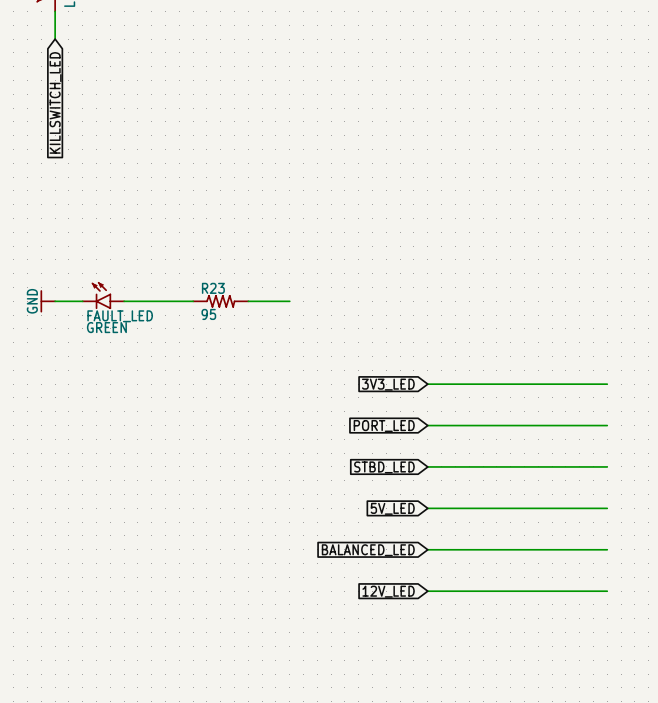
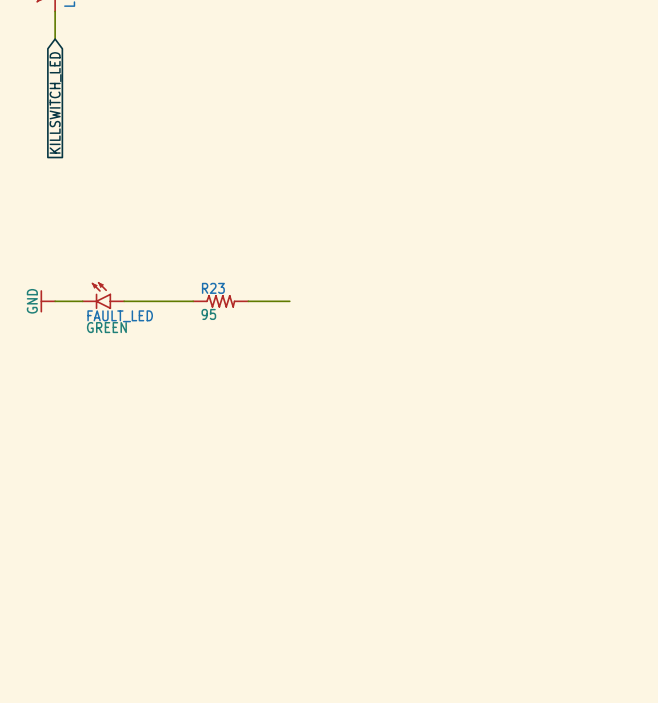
global label: 3V3_LED (388, 384) -> none
wire: (427, 384) (607, 384) -> none
wire: (427, 425) (607, 425) -> none
global label: PORT_LED (384, 426) -> none
wire: (427, 466) (607, 466) -> none
global label: STBD_LED (384, 467) -> none
global label: 5V_LED (392, 508) -> none
wire: (427, 508) (607, 508) -> none
wire: (427, 549) (607, 549) -> none
global label: BALANCED_LED (368, 550) -> none
global label: 12V_LED (388, 591) -> none
wire: (427, 591) (607, 591) -> none

